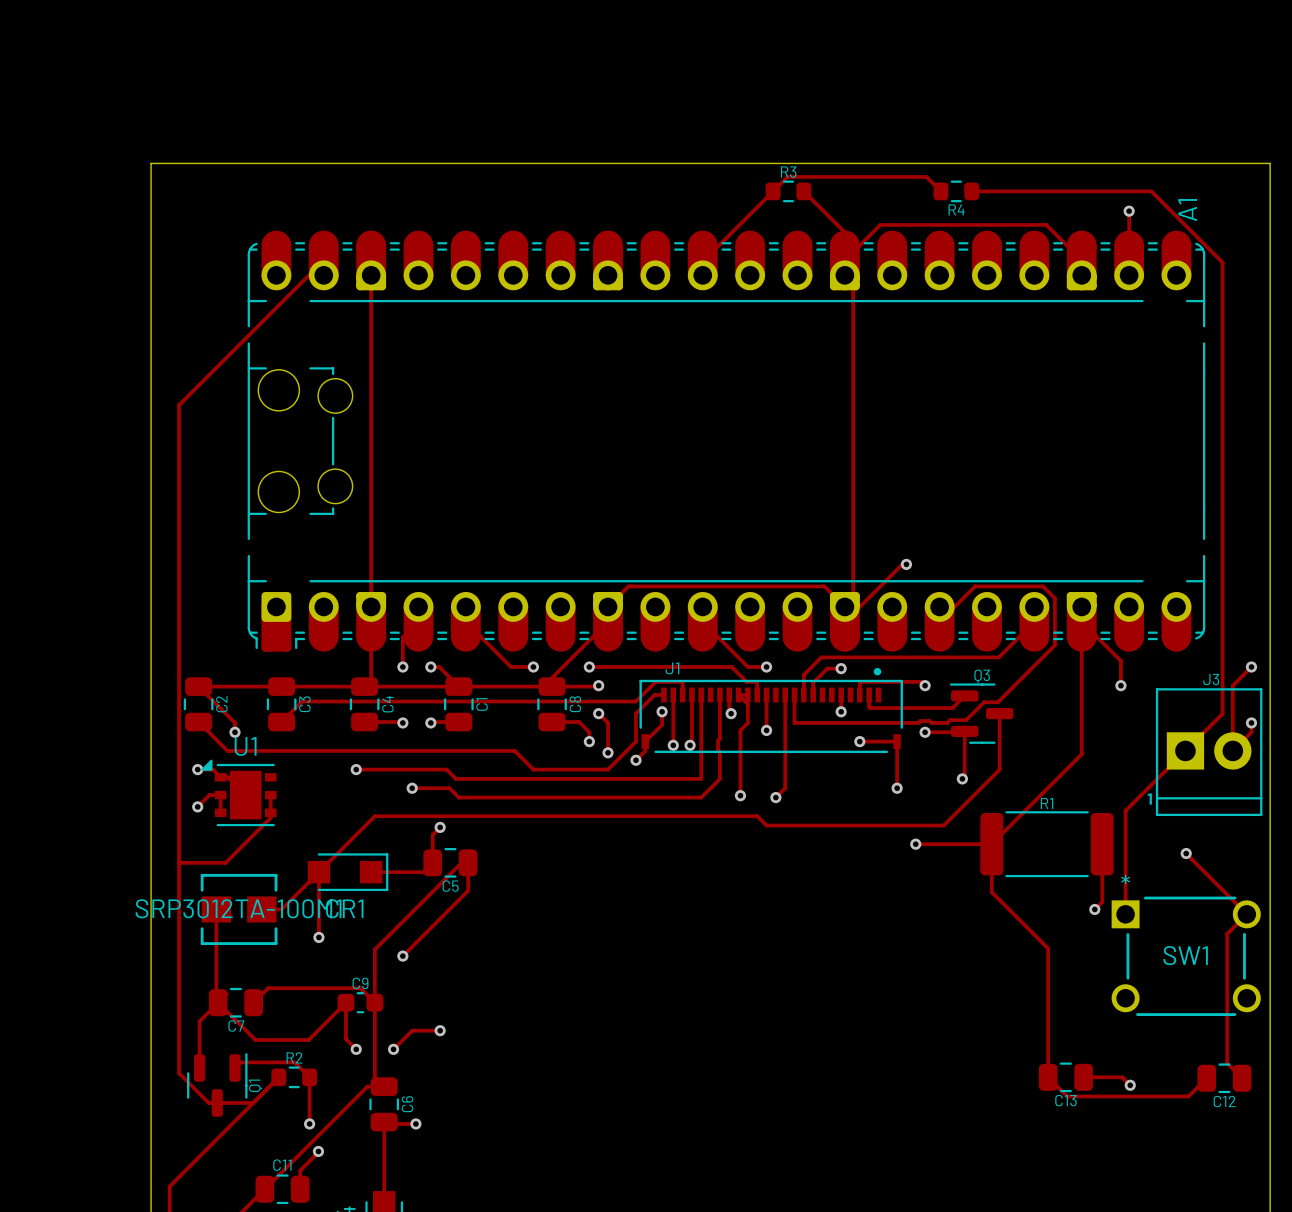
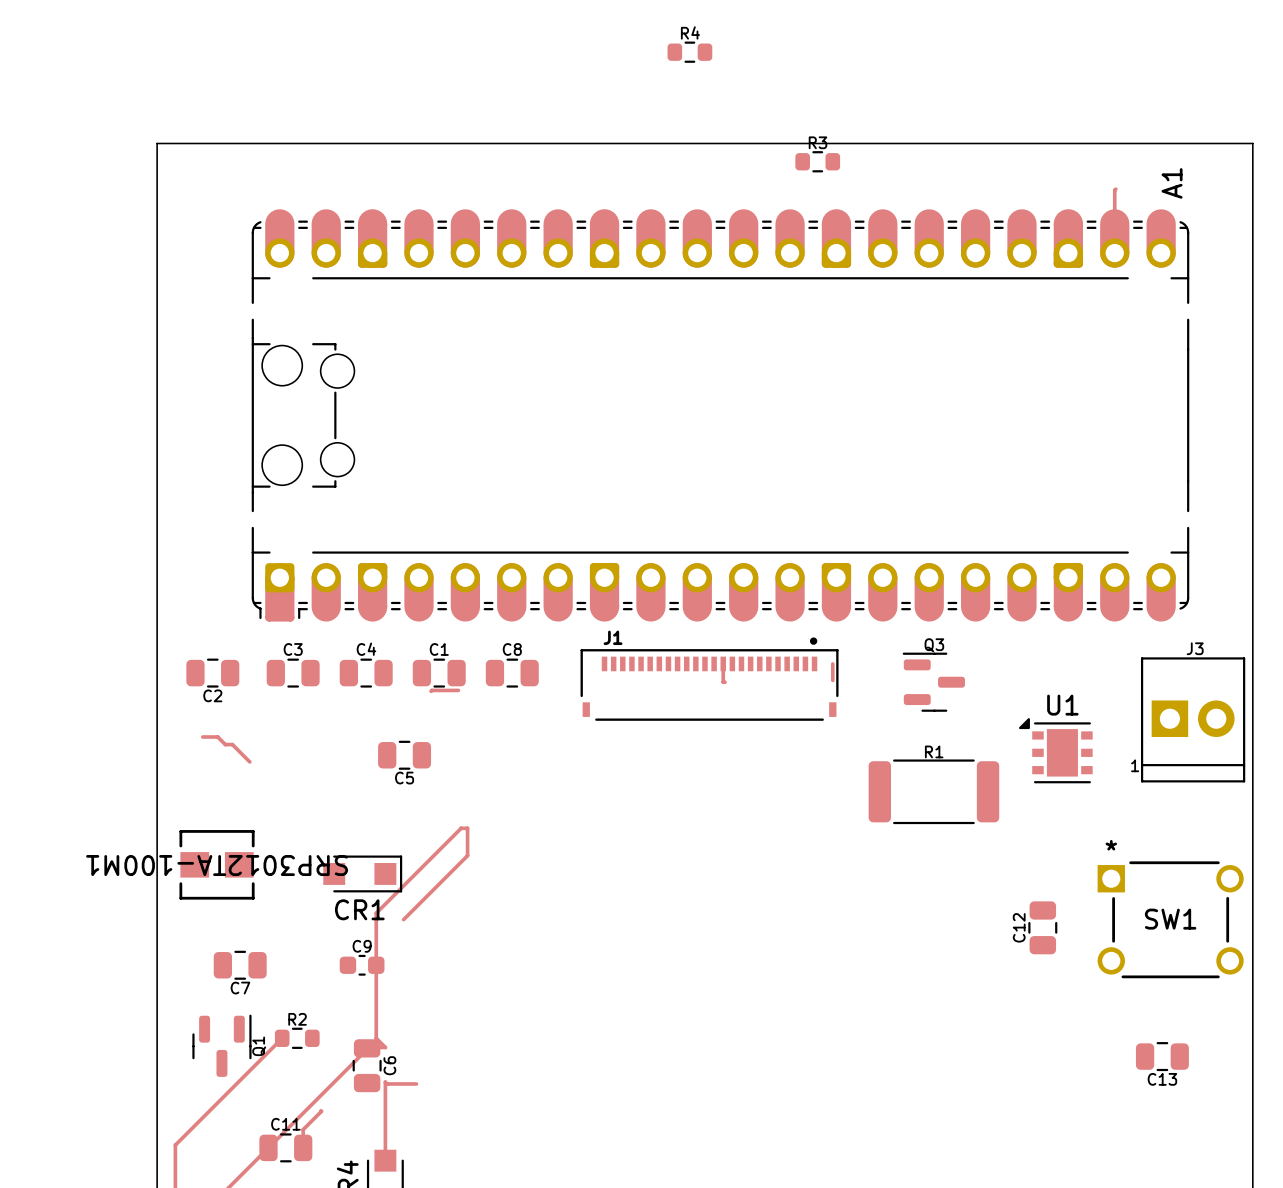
R3 position: (788, 191) -> (817, 161)
track: (803, 191) (844, 232) (844, 275) (853, 283) (853, 598) (844, 606) (824, 586) (628, 586) (608, 606) -> none
track: (940, 191) (926, 176) (787, 176) (702, 261) (702, 275) -> none
R4 position: (956, 191) -> (689, 52)
track: (971, 191) (1151, 191) (1222, 262) (1222, 713) (1125, 810) (1125, 914) -> none
R4 name position: R4 (956, 209) -> R4 (690, 32)
via: (1129, 211) -> none
track: (323, 260) (179, 405) (179, 1073) (208, 1102) (253, 1102) -> none
track: (844, 260) (880, 224) (1046, 224) (1081, 260) -> none
track: (371, 275) (371, 680) (364, 686) -> none
track: (906, 564) (902, 564) (844, 621) -> none
via: (906, 564) -> none
track: (418, 621) (402, 637) (402, 667) -> none
track: (465, 621) (511, 667) (533, 667) -> none
track: (702, 621) (747, 667) (766, 667) -> none
track: (939, 621) (975, 586) (1042, 586) (1054, 598) (1054, 645) (997, 702) (984, 702) (966, 720) (950, 720) (947, 722) (931, 722) (929, 721) (920, 721) (918, 722) (794, 722) (794, 694) -> none
track: (1034, 621) (998, 657) (821, 657) (803, 674) (803, 694) -> none
track: (608, 630) (608, 621) (552, 677) (552, 686) -> none
via: (402, 667) -> none
track: (430, 667) (439, 667) (458, 686) -> none
via: (430, 667) -> none
via: (533, 667) -> none
track: (589, 667) (731, 667) (746, 681) (757, 682) (757, 694) -> none
via: (589, 667) -> none
via: (766, 667) -> none
track: (1251, 667) (1232, 685) (1232, 750) (1251, 732) (1251, 722) -> none
via: (1251, 667) -> none
track: (841, 668) (827, 668) (813, 682) (813, 694) -> none
via: (841, 668) -> none
track: (598, 685) (198, 686) (235, 722) (235, 732) -> none
via: (598, 685) -> none
track: (925, 685) (921, 681) (860, 681) (859, 694) -> none
via: (925, 685) -> none
track: (1120, 685) (1120, 661) (1081, 621) (1081, 754) (991, 844) -> none
via: (1120, 685) -> none
track: (663, 694) (654, 694) (635, 713) (635, 741) (608, 769) (533, 769) (514, 750) (227, 750) (198, 722) -> none
track: (673, 694) (673, 745) -> none
track: (682, 694) (681, 681) (655, 681) (635, 701) (302, 701) (281, 722) -> none
track: (691, 694) (691, 743) (690, 745) -> none
track: (701, 694) (701, 778) (456, 778) (446, 769) (356, 769) -> none
track: (719, 694) (719, 738) (718, 740) (719, 778) (701, 797) (458, 797) (449, 788) (412, 788) -> none
track: (747, 694) (738, 694) (747, 704) (747, 722) (740, 730) (740, 795) (738, 797) -> none
track: (766, 694) (766, 730) -> none
track: (785, 694) (785, 788) (775, 797) -> none
track: (869, 694) (870, 708) (952, 708) (964, 695) -> none
C2 rotation: 0° (198, 704) -> 90° clockwise (212, 673)
C3 rotation: 0° (281, 704) -> 90° clockwise (293, 673)
C4 rotation: 0° (364, 704) -> 90° clockwise (366, 673)
C1 rotation: 0° (458, 704) -> 90° clockwise (439, 673)
C8 rotation: 0° (552, 704) -> 90° clockwise (512, 673)
C8 position: (552, 704) -> (512, 673)
J1 position: (771, 710) -> (709, 679)
track: (662, 711) (662, 724) (645, 741) (645, 750) (636, 760) -> none
via: (662, 711) -> none
via: (841, 711) -> none
track: (598, 713) (608, 722) (608, 752) -> none
via: (598, 713) -> none
via: (731, 713) -> none
Q3 position: (981, 713) -> (933, 682)
track: (999, 713) (999, 769) (943, 825) (766, 825) (757, 816) (374, 816) (281, 909) (261, 909) -> none
track: (364, 722) (402, 722) -> none
via: (402, 722) -> none
via: (430, 722) -> none
track: (552, 722) (579, 722) (589, 732) (589, 741) -> none
via: (1251, 722) -> none
via: (766, 730) -> none
via: (235, 732) -> none
track: (925, 732) (964, 731) (964, 776) (962, 778) -> none
via: (925, 732) -> none
via: (589, 741) -> none
track: (859, 741) (897, 741) (897, 788) -> none
via: (859, 741) -> none
via: (673, 745) -> none
via: (690, 745) -> none
via: (608, 752) -> none
via: (636, 760) -> none
via: (197, 769) -> none
via: (356, 769) -> none
via: (962, 778) -> none
via: (412, 788) -> none
via: (897, 788) -> none
U1 position: (238, 792) -> (1055, 750)
track: (270, 795) (270, 817) (225, 862) (179, 862) -> none
via: (740, 795) -> none
via: (775, 797) -> none
track: (197, 806) (209, 795) (220, 795) (220, 812) -> none
via: (197, 806) -> none
track: (440, 827) (432, 834) (432, 862) (423, 872) (371, 872) -> none
via: (440, 827) -> none
track: (915, 844) (991, 844) -> none
via: (915, 844) -> none
track: (991, 844) (991, 892) (1048, 948) (1048, 1077) (1067, 1096) (1188, 1096) (1206, 1078) -> none
R1 position: (1047, 844) -> (933, 791)
track: (1102, 844) (1102, 902) (1094, 909) -> none
track: (1186, 853) (1246, 914) (1227, 933) (1227, 1063) (1242, 1078) -> none
via: (1186, 853) -> none
C5 position: (450, 862) -> (404, 755)
track: (318, 872) (318, 937) -> none
CR1 position: (348, 872) -> (362, 873)
SRP3012TA-100M1 name rotation: 0° (238, 908) -> 180° (217, 865)
track: (216, 909) (216, 1000) (255, 1040) (308, 1040) (345, 1002) (345, 1039) (356, 1049) -> none
SRP3012TA-100M1 position: (239, 909) -> (217, 864)
via: (1094, 909) -> none
via: (318, 937) -> none
via: (402, 956) -> none
track: (226, 994) (199, 1021) (199, 1068) -> none
track: (253, 1002) (268, 988) (360, 988) (374, 1002) -> none
track: (440, 1030) (412, 1030) (393, 1049) -> none
via: (440, 1030) -> none
via: (356, 1049) -> none
via: (393, 1049) -> none
track: (235, 1068) (240, 1062) (294, 1062) (309, 1077) (309, 1123) -> none
C13 position: (1065, 1077) -> (1162, 1056)
track: (1083, 1077) (1122, 1077) (1130, 1085) -> none
C12 rotation: 0° (1224, 1078) -> 90° clockwise (1042, 927)
C12 position: (1224, 1078) -> (1042, 927)
via: (1130, 1085) -> none
C6 position: (384, 1104) -> (367, 1065)
via: (309, 1123) -> none
via: (415, 1123) -> none
via: (318, 1151) -> none

